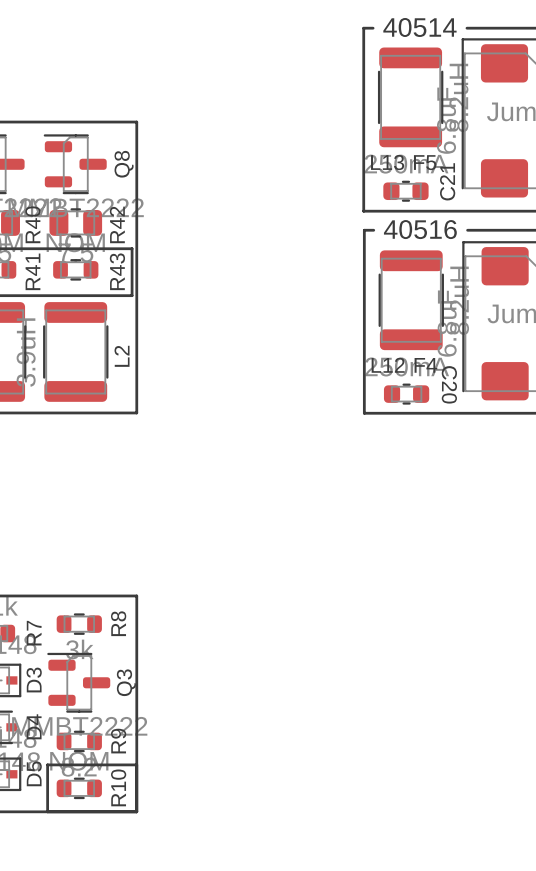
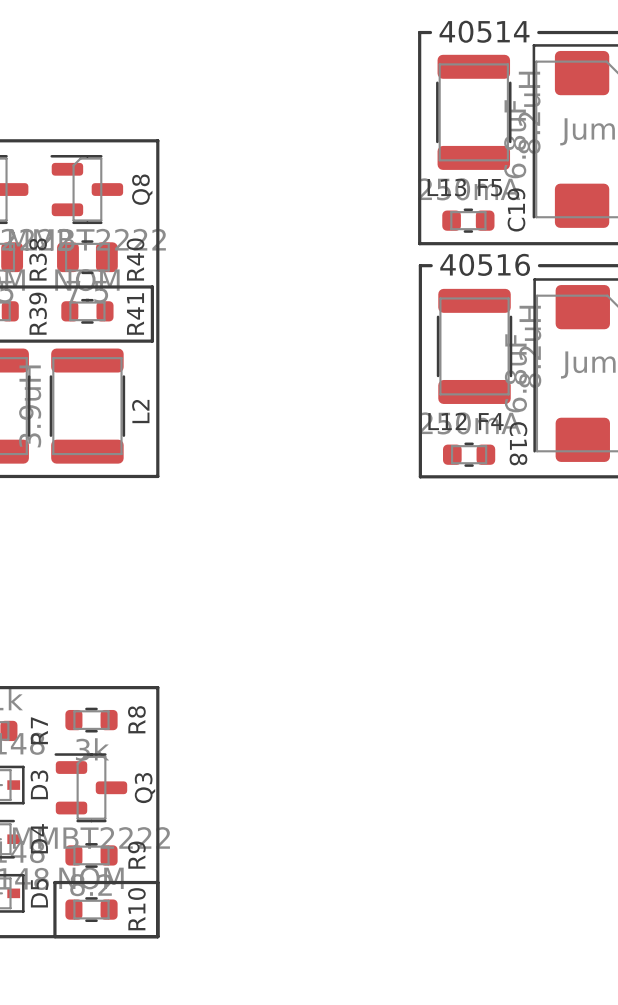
C21 name: C21 (447, 181) -> C19 (516, 209)
R40 name: R40 (32, 224) -> R38 (38, 259)
R42 name: R42 (117, 224) -> R40 (135, 259)
R41 name: R41 (32, 271) -> R39 (38, 313)
R43 name: R43 (117, 271) -> R41 (135, 313)
C20 name: C20 (449, 384) -> C18 (518, 443)

